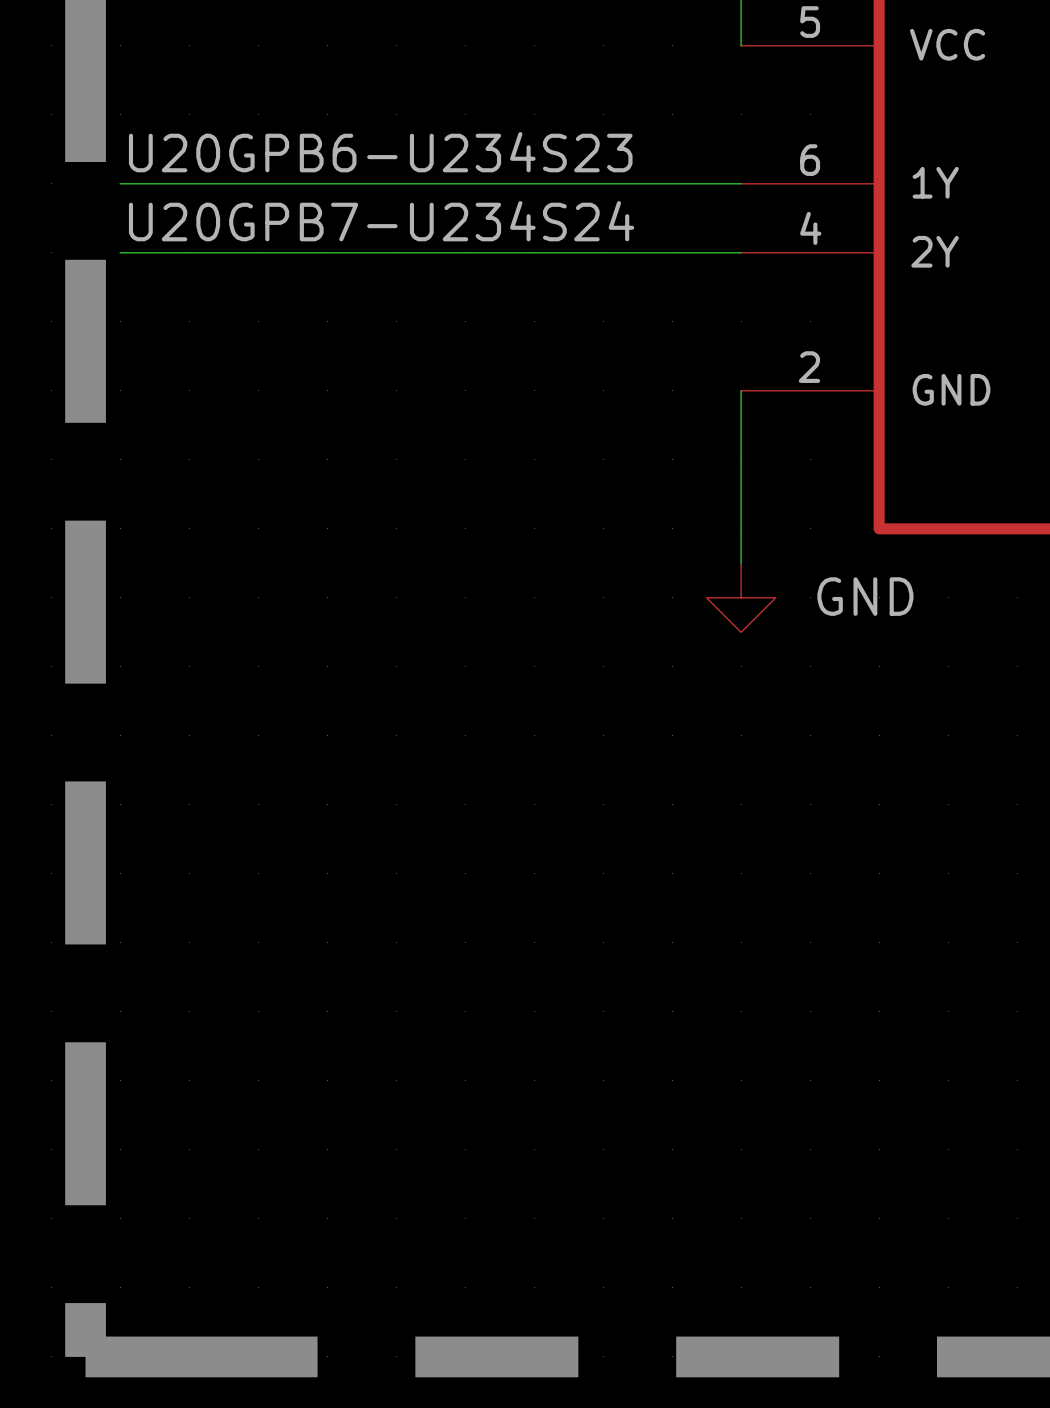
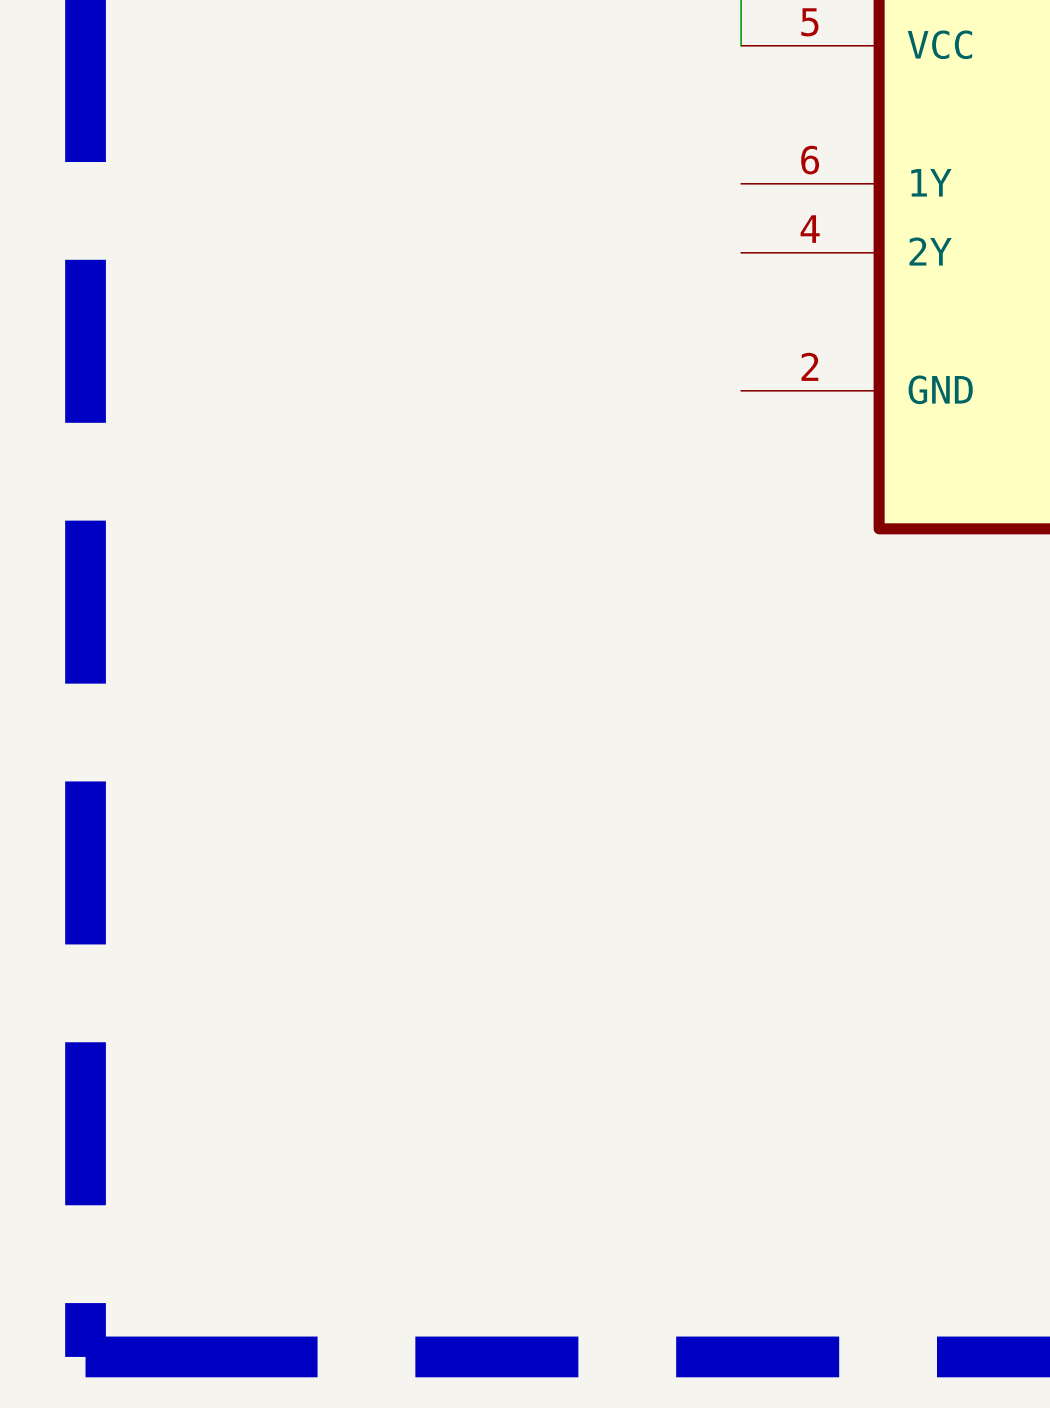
label: U20GPB6-U234S23 (380, 152) -> none
wire: (120, 183) (741, 183) -> none
label: U20GPB7-U234S24 (381, 221) -> none
wire: (120, 252) (741, 252) -> none
wire: (741, 390) (741, 563) -> none
power symbol: GND (741, 597) -> none

